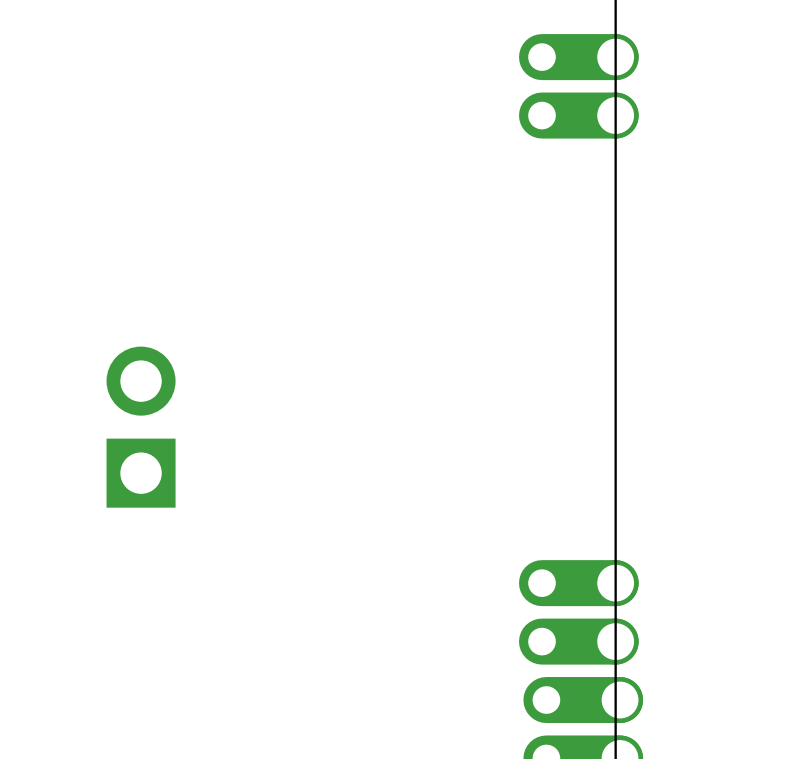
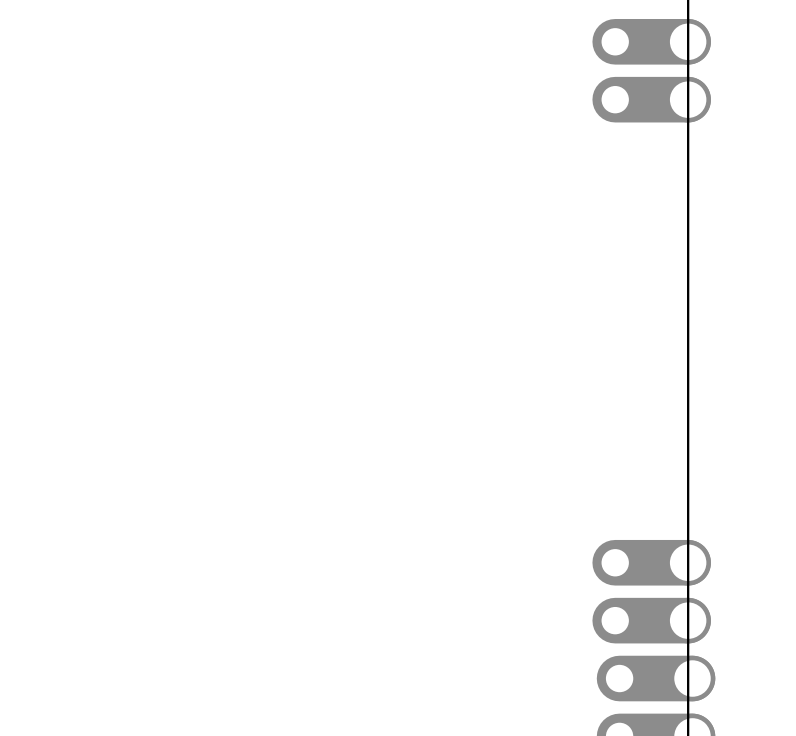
part: (141, 427) -> none

